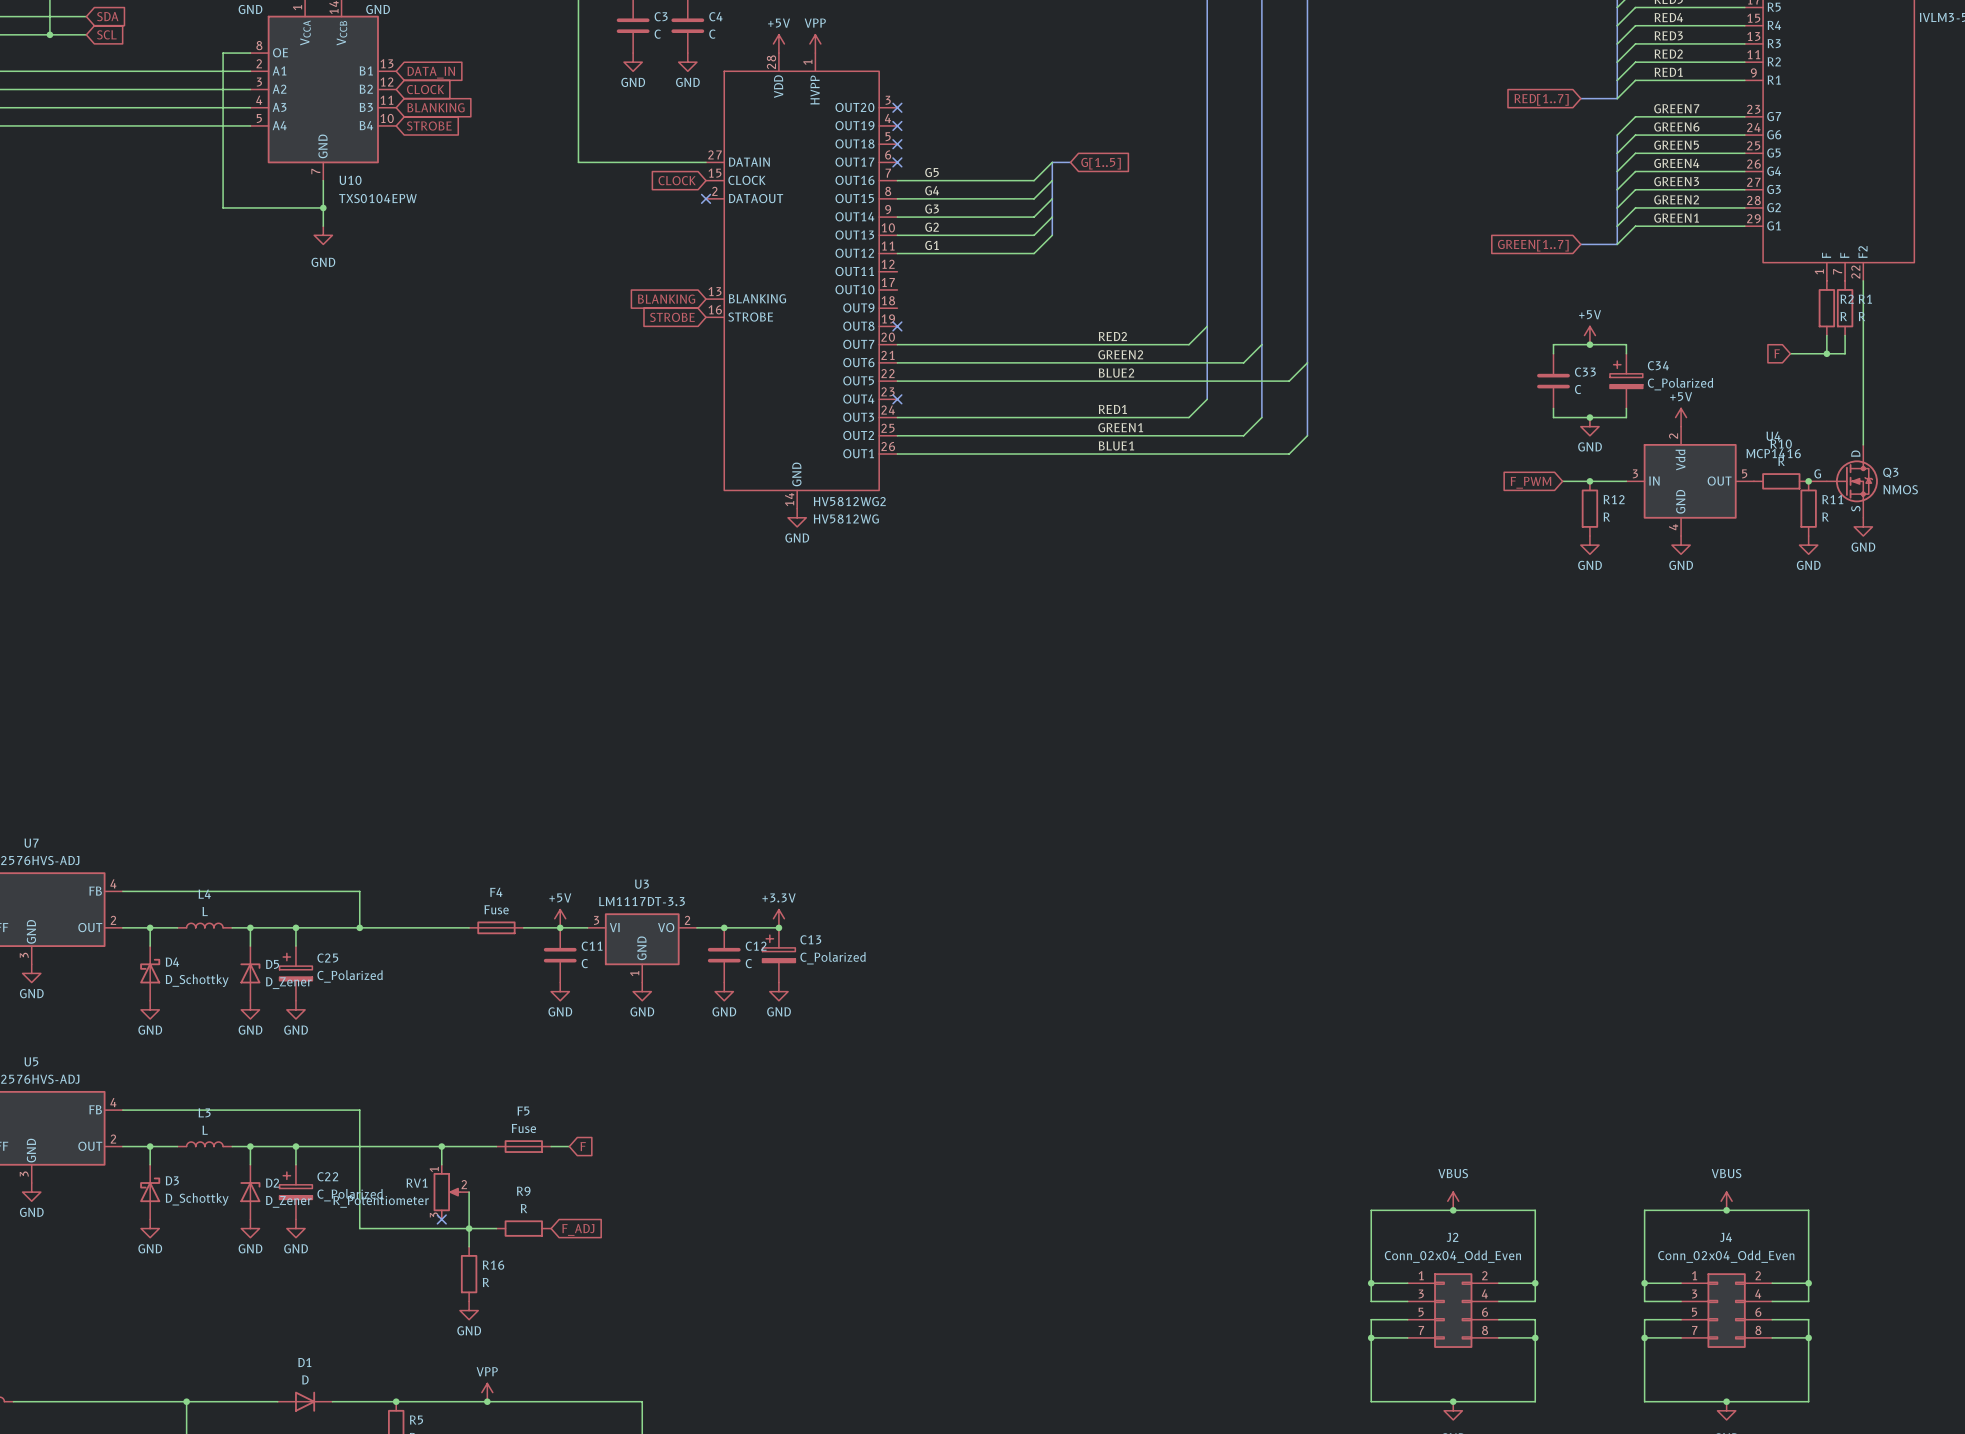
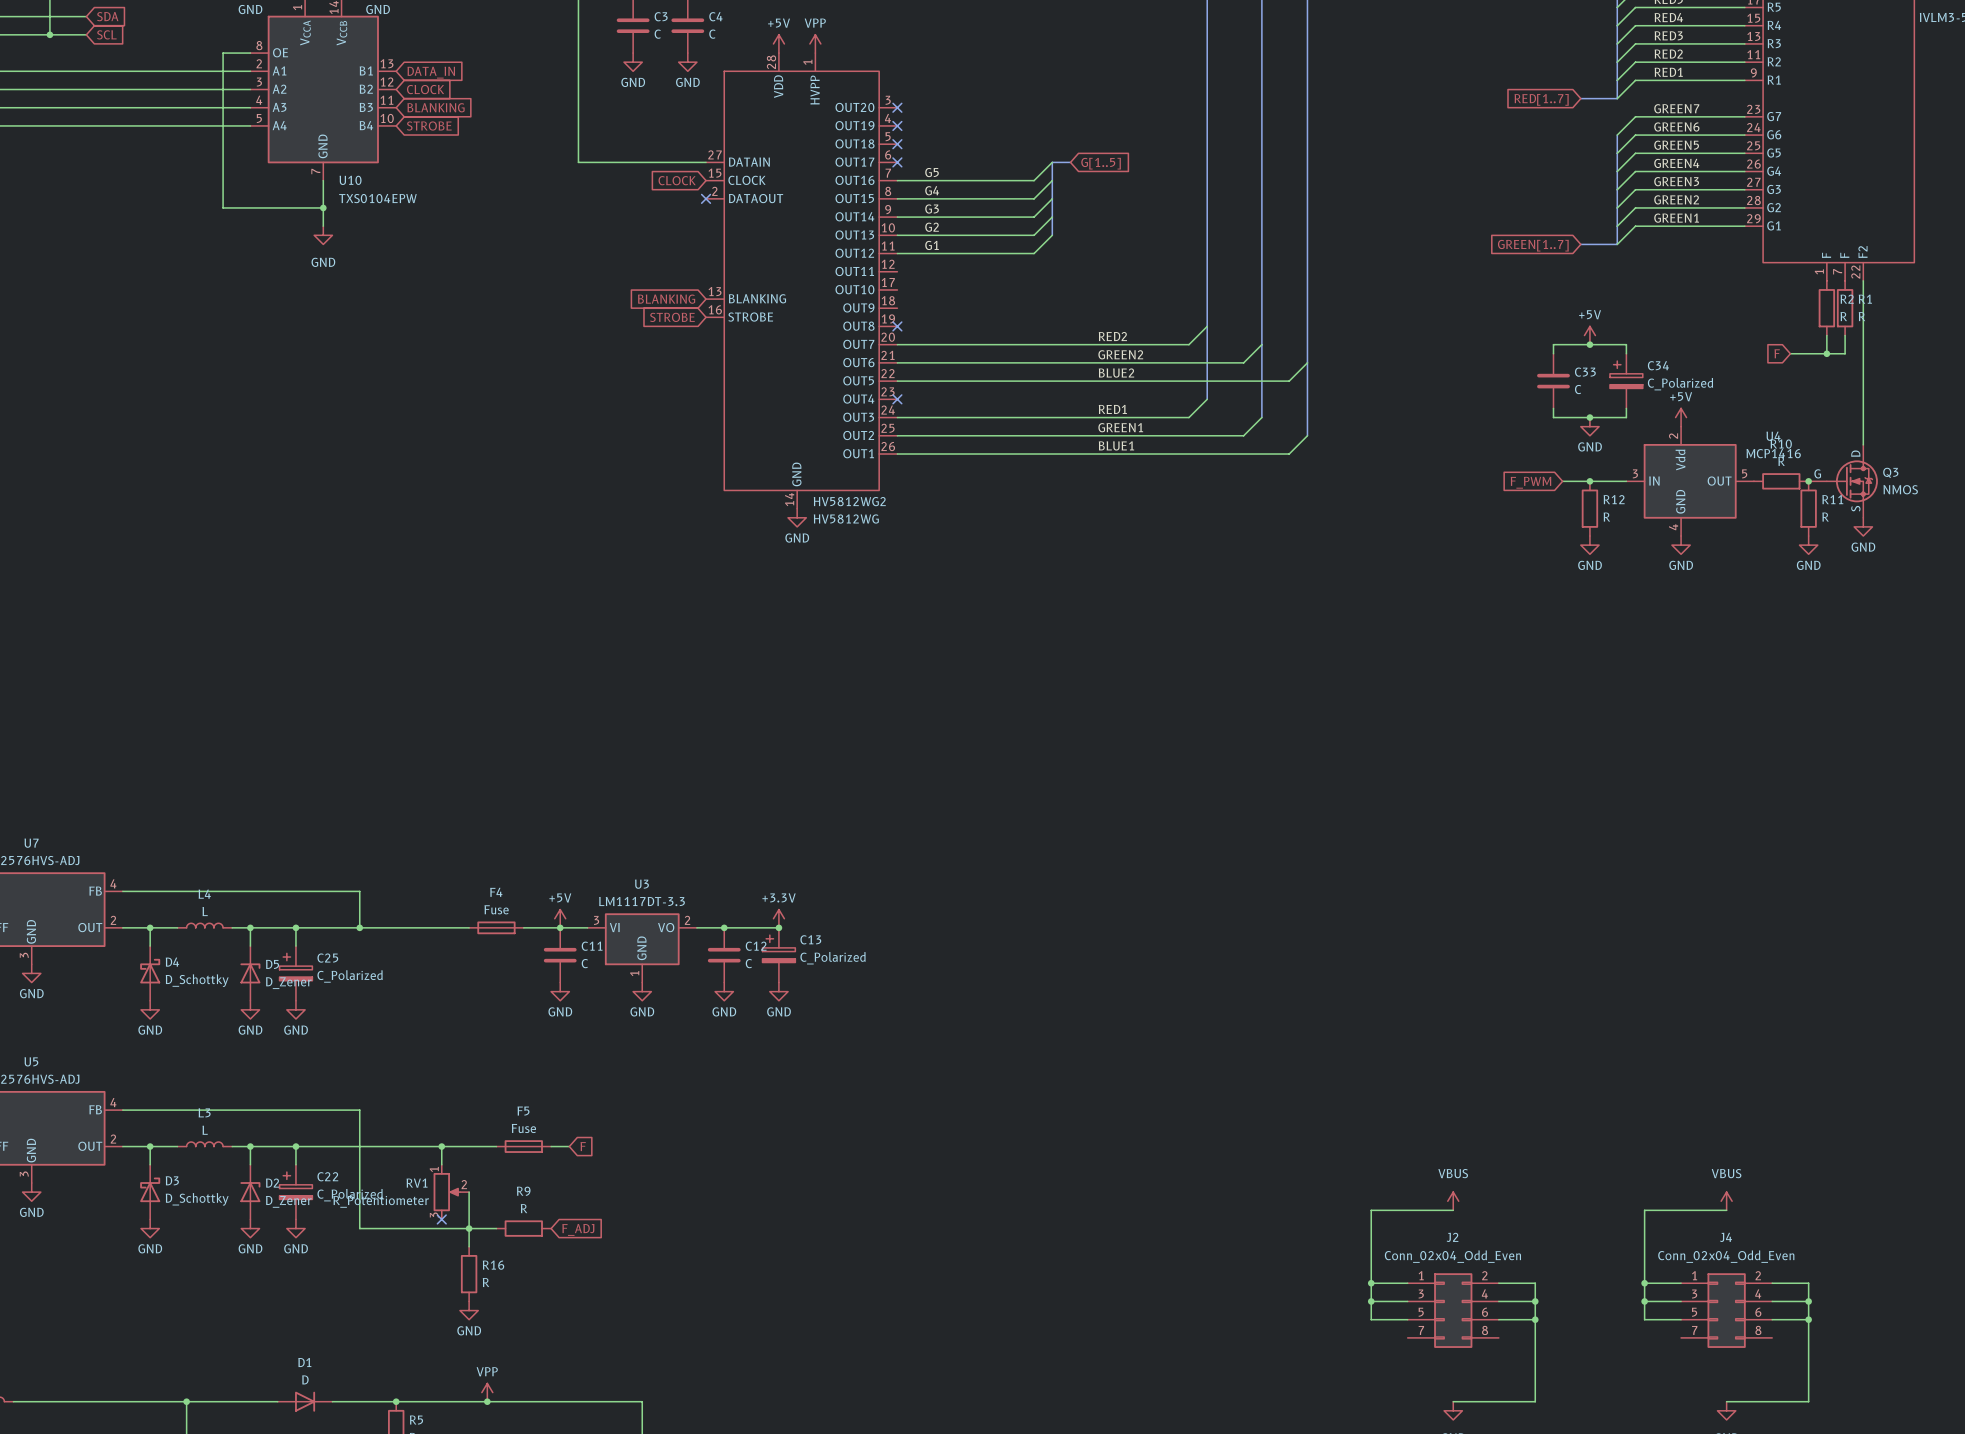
wire: (1453, 1210) (1535, 1210) (1535, 1283) -> none
junction: (1453, 1210) -> none
wire: (1726, 1210) (1808, 1210) (1808, 1283) -> none
junction: (1726, 1210) -> none
junction: (1535, 1283) -> none
junction: (1808, 1283) -> none
wire: none -> (1535, 1301) (1535, 1319)
junction: none -> (1535, 1301)
wire: none -> (1808, 1301) (1808, 1319)
junction: none -> (1808, 1301)
wire: (1371, 1319) (1371, 1401) (1453, 1401) -> (1371, 1319) (1371, 1301)
junction: none -> (1535, 1319)
wire: (1644, 1319) (1644, 1401) (1726, 1401) -> (1644, 1319) (1644, 1301)
junction: none -> (1808, 1319)
wire: (1371, 1337) (1407, 1337) -> none
junction position: (1371, 1337) -> (1371, 1301)
wire: (1498, 1337) (1535, 1337) -> none
junction: (1535, 1337) -> none
wire: (1644, 1337) (1681, 1337) -> none
junction position: (1644, 1337) -> (1644, 1301)
wire: (1772, 1337) (1808, 1337) -> none
junction: (1808, 1337) -> none
junction: (1453, 1401) -> none
junction: (1726, 1401) -> none

